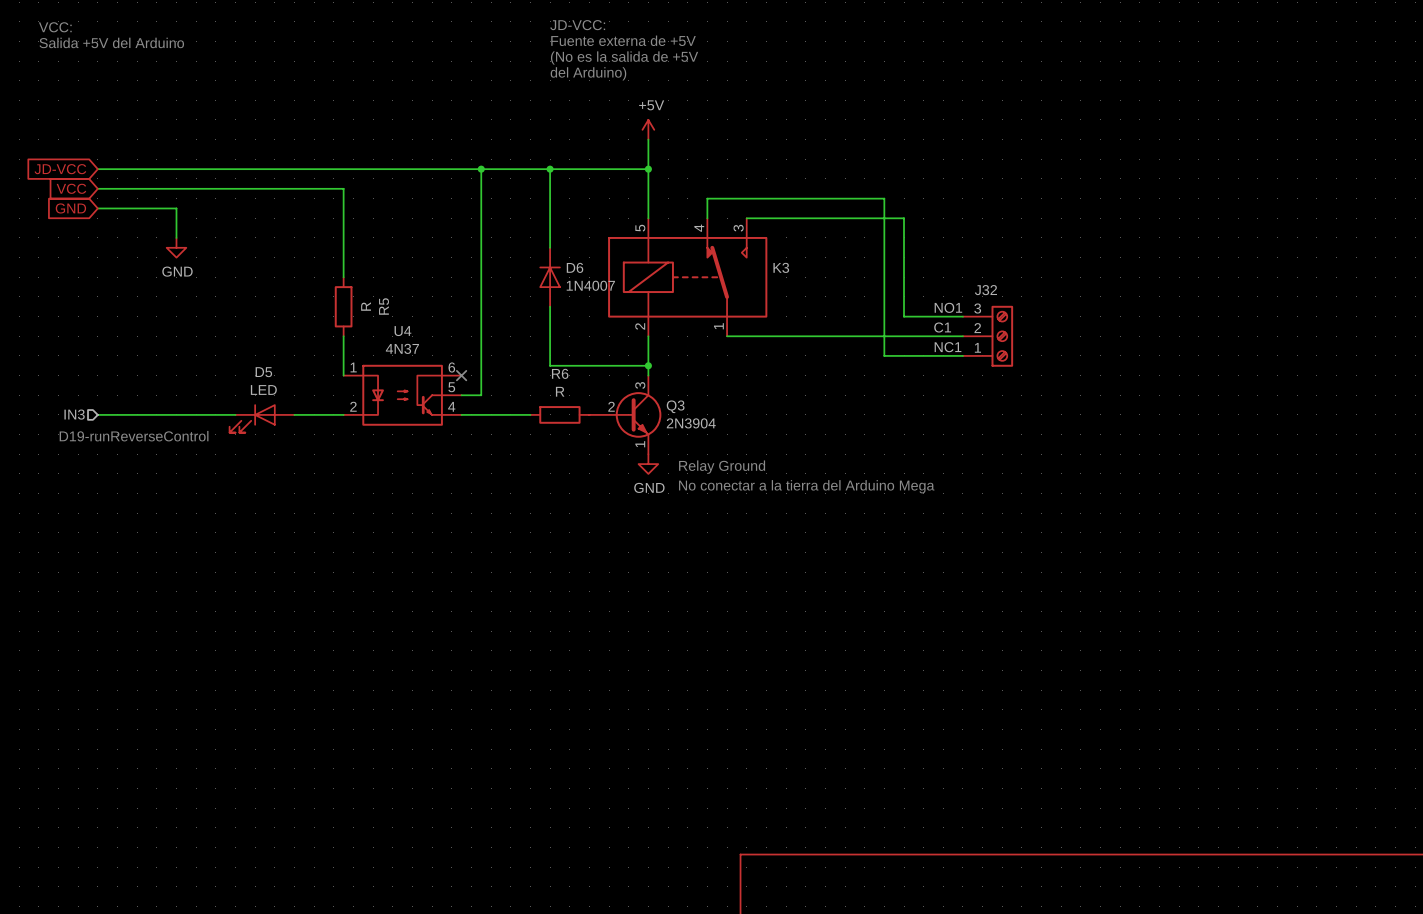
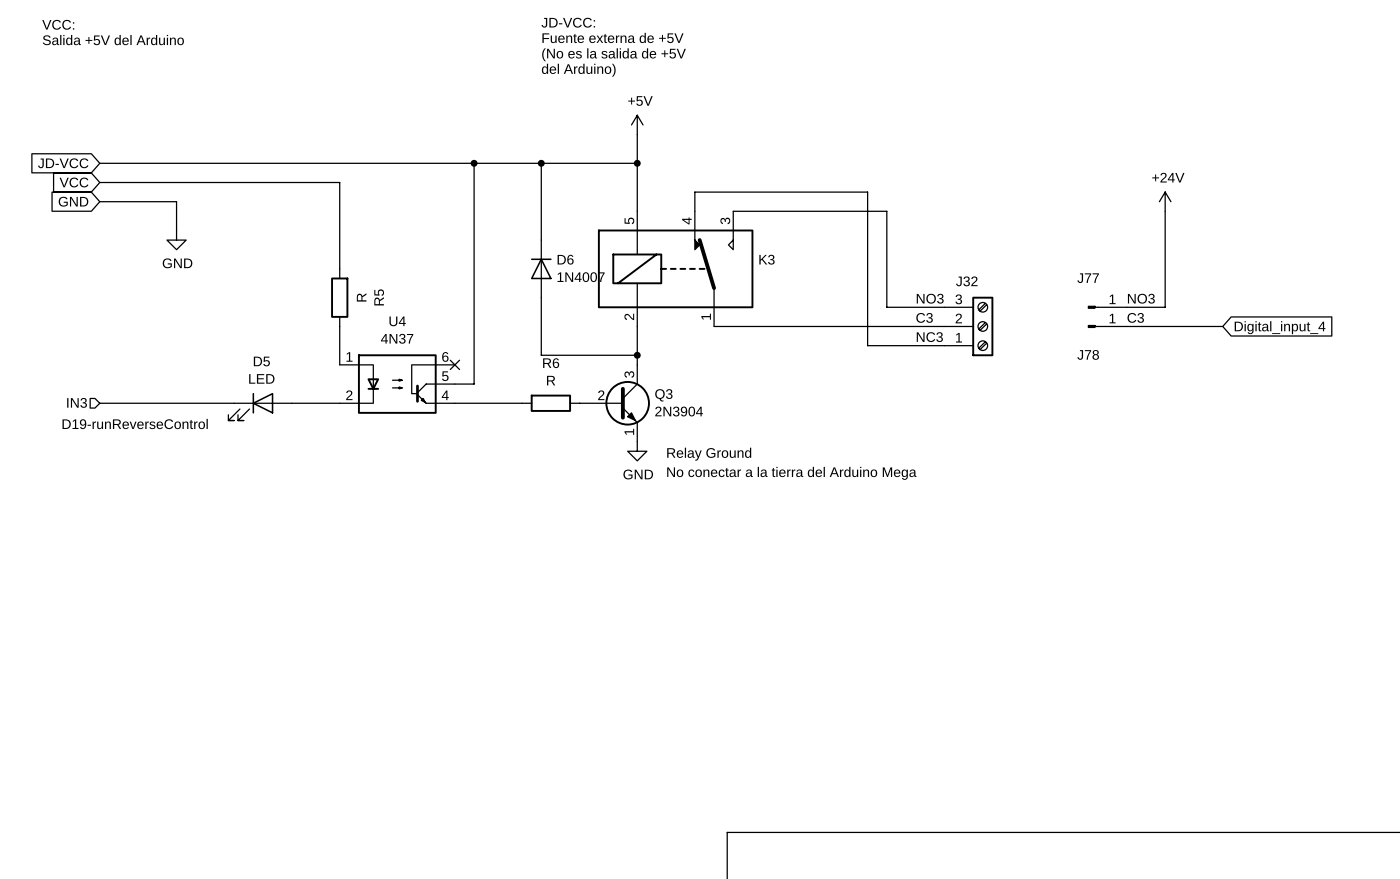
power symbol: none -> +24V (1165, 201)
wire: none -> (1165, 211) (1165, 307) (1126, 307)
label: NO1 (948, 307) -> NO3 (930, 298)
label: none -> NO3 (1141, 298)
J77: none -> (1107, 307)
label: C1 (942, 327) -> C3 (924, 317)
label: none -> C3 (1135, 317)
J78: none -> (1107, 326)
wire: none -> (1126, 326) (1222, 326)
global label: none -> Digital_input_4 (1280, 327)
label: NC1 (948, 347) -> NC3 (929, 337)

